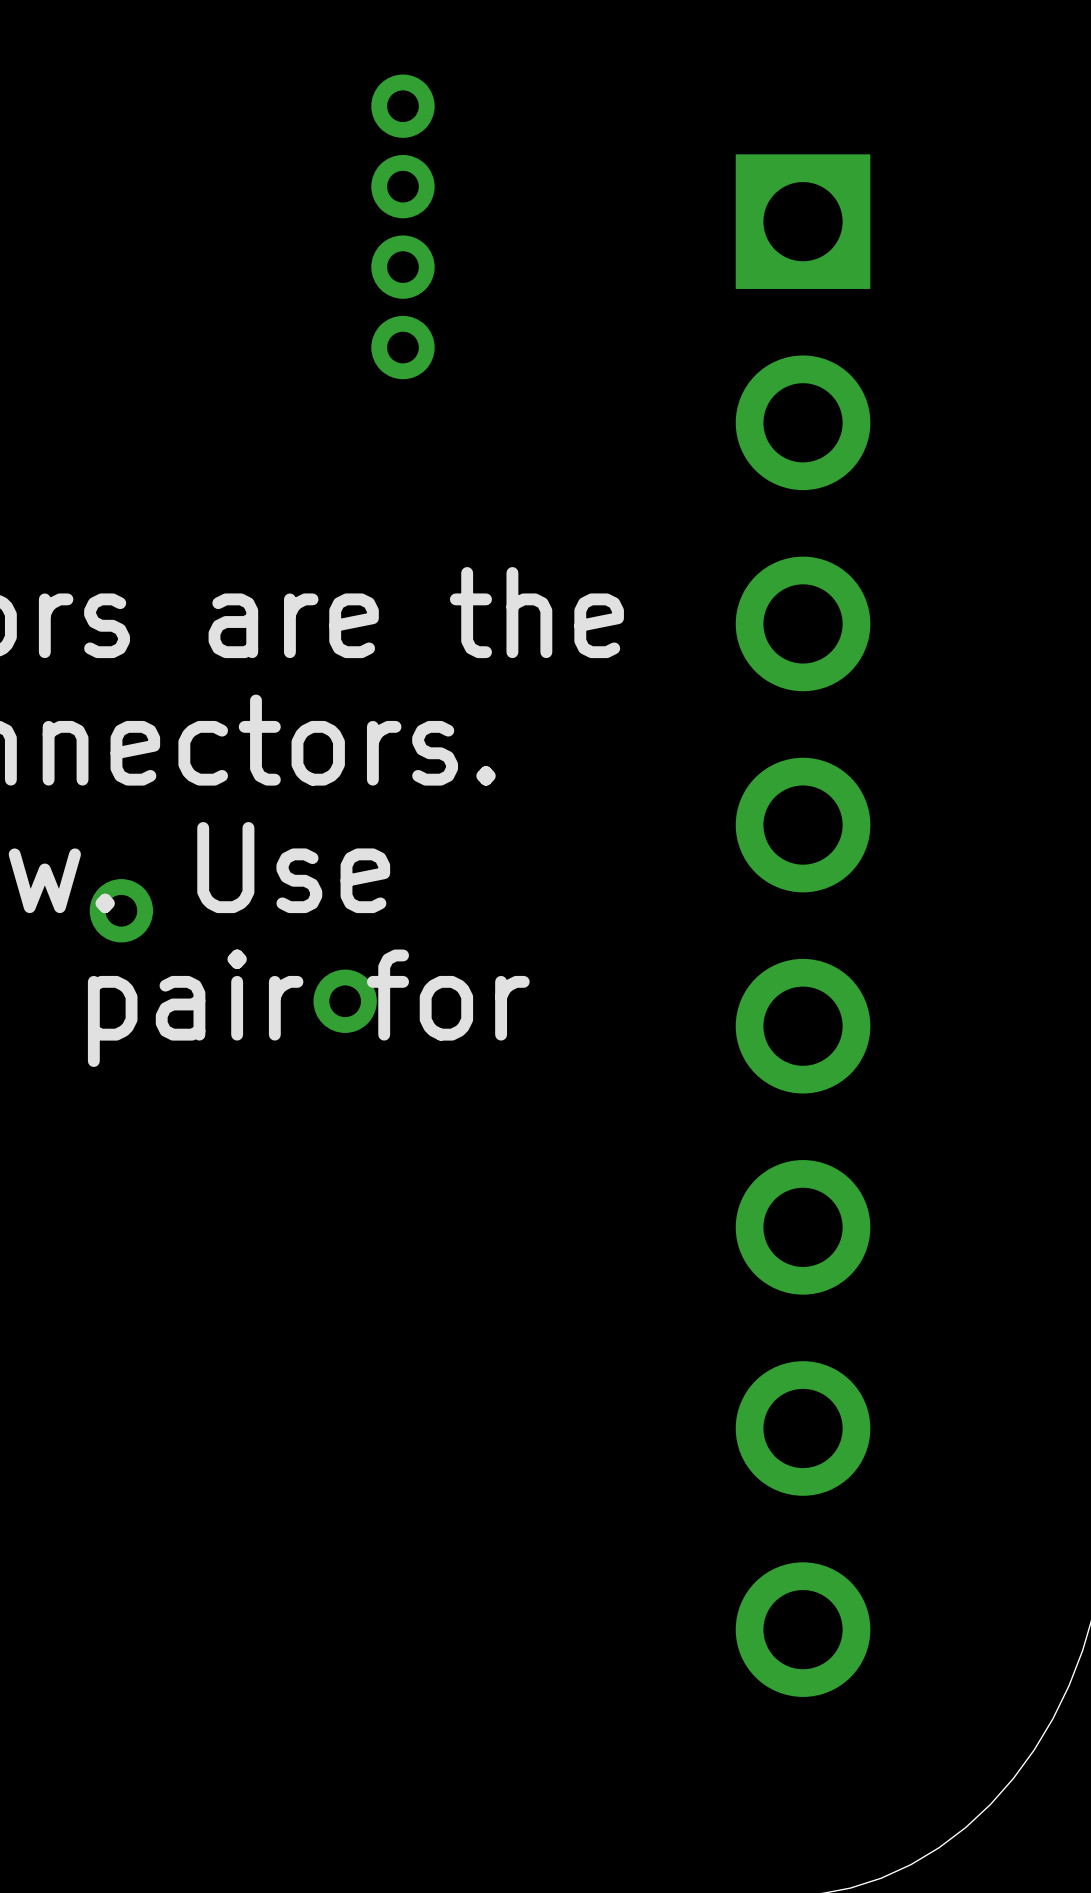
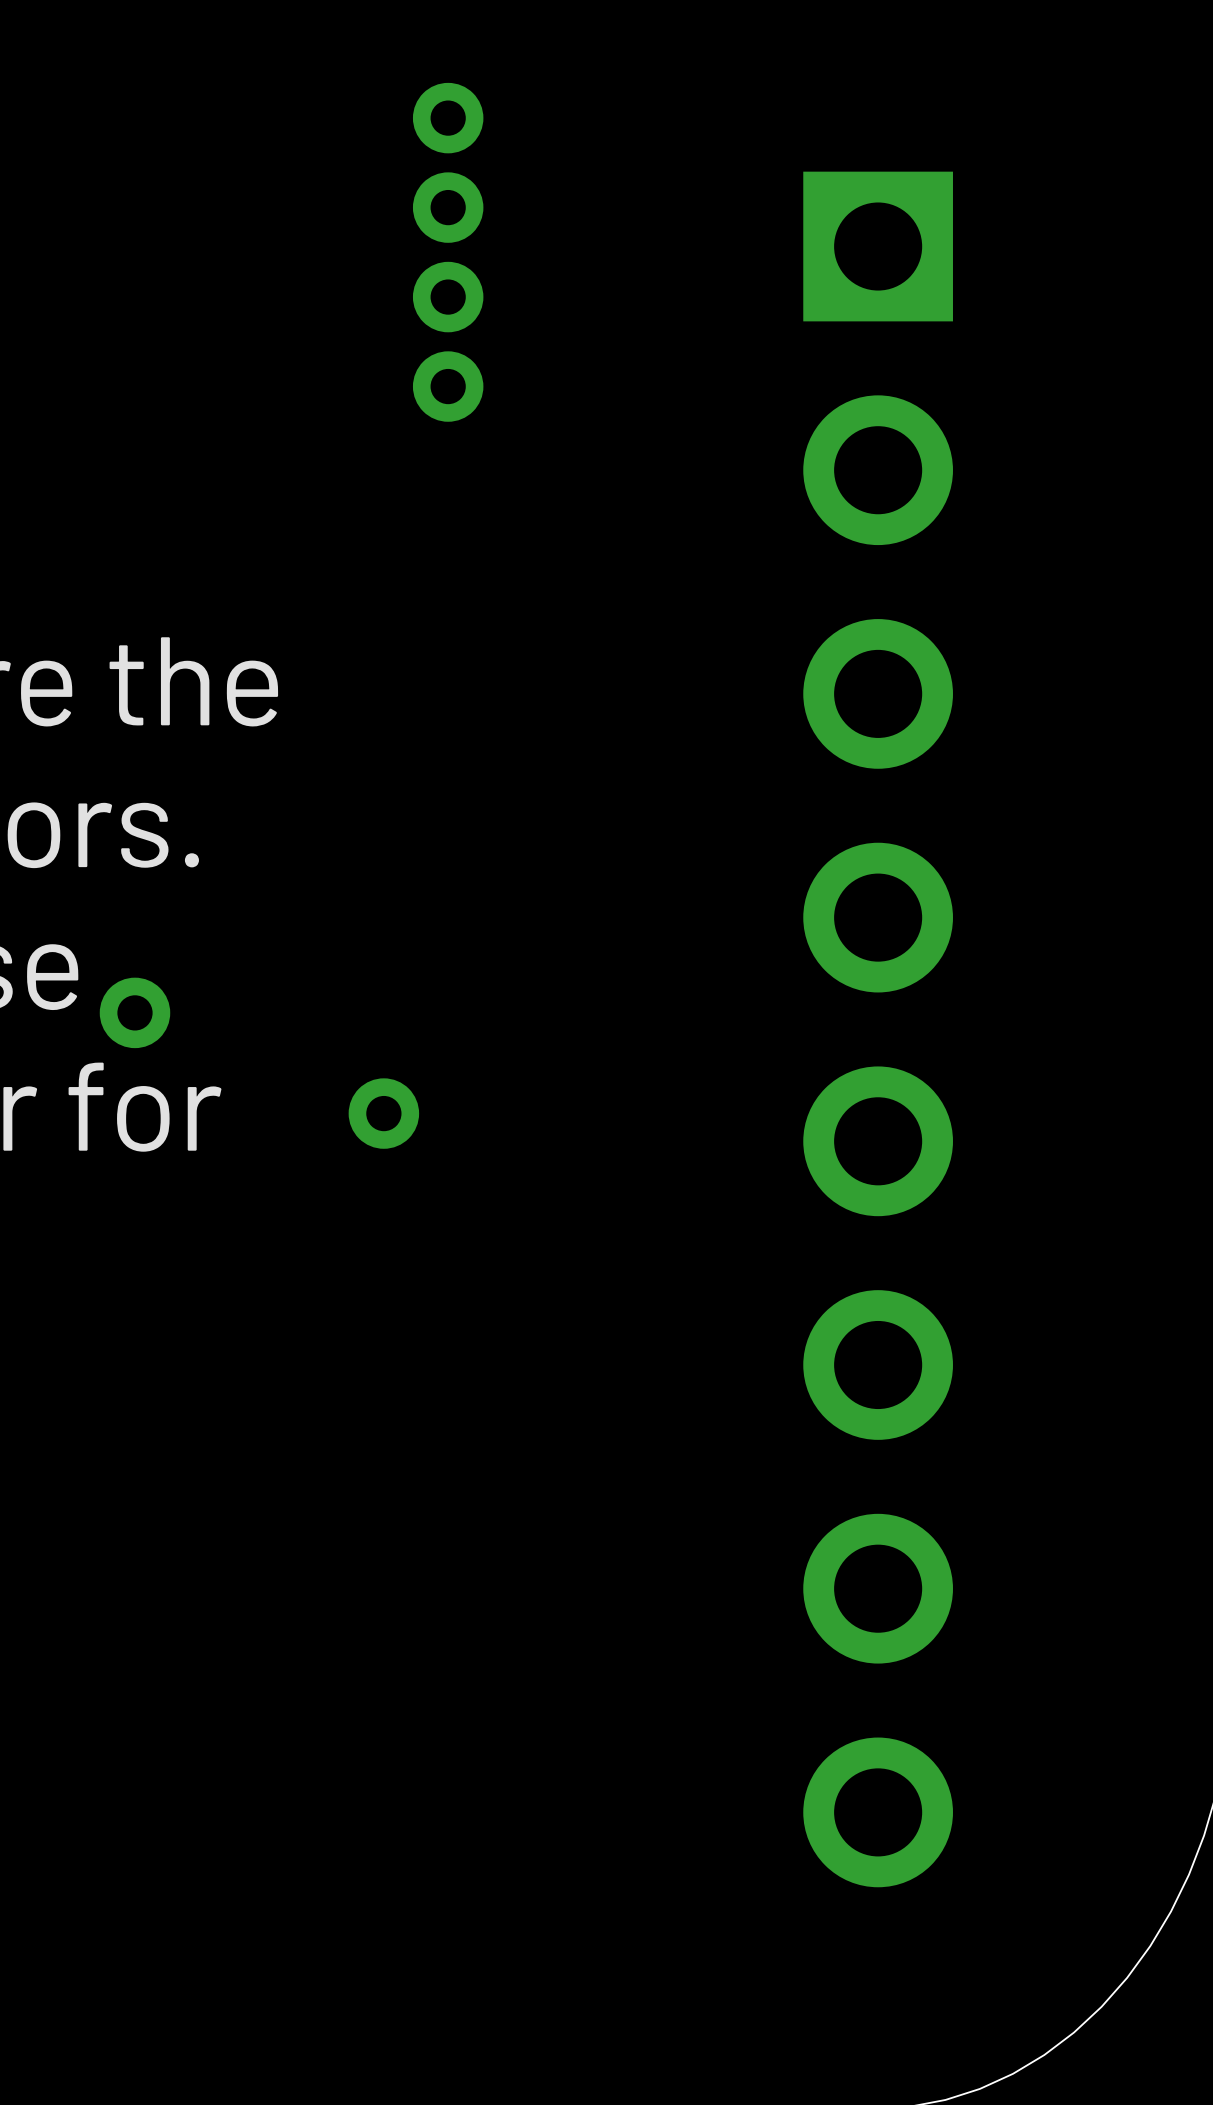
part position: (803, 925) -> (878, 1029)

